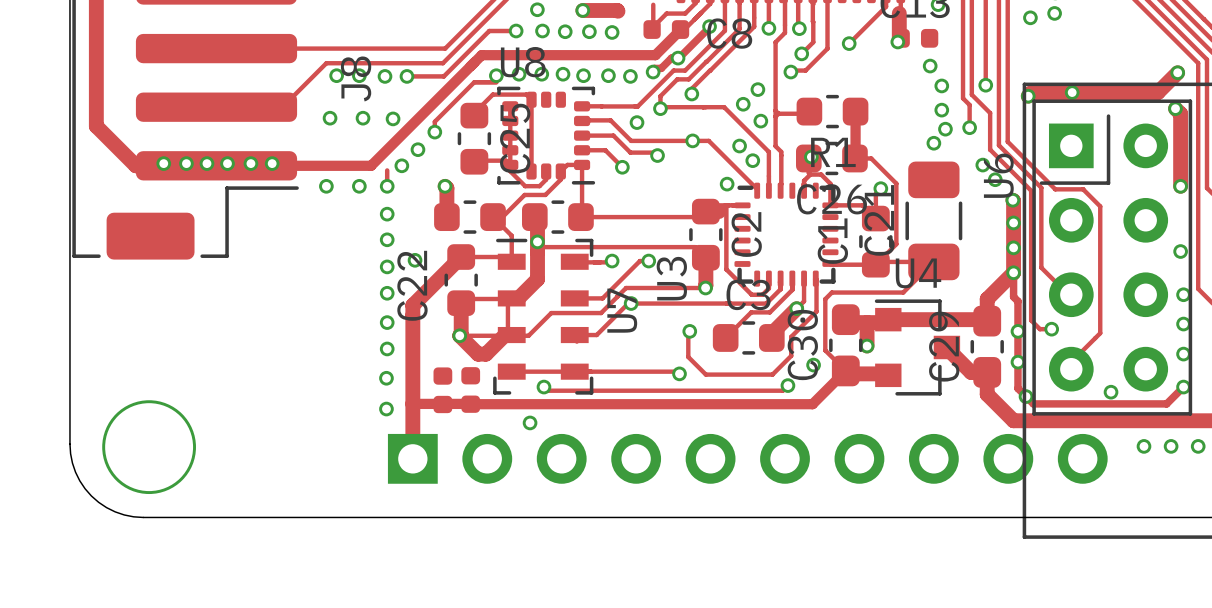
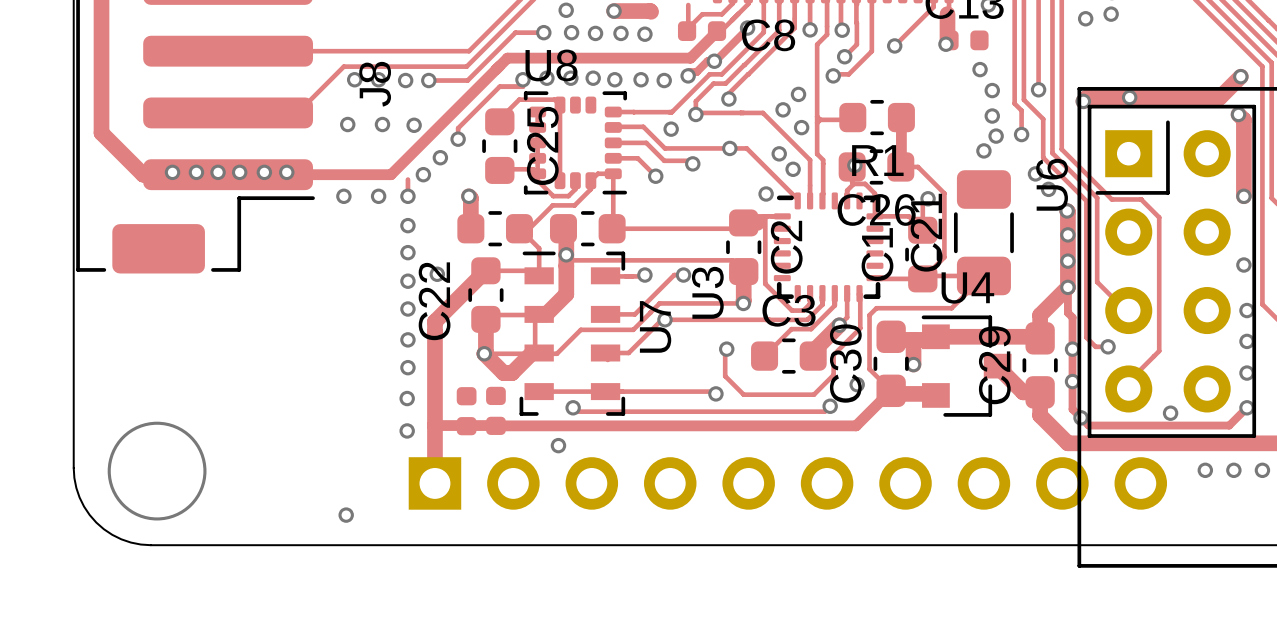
via: none -> (346, 515)

